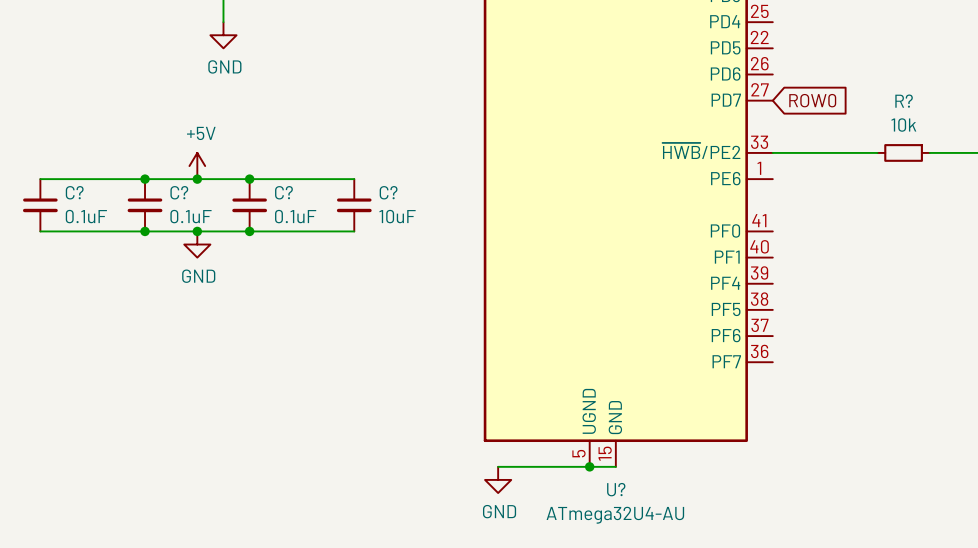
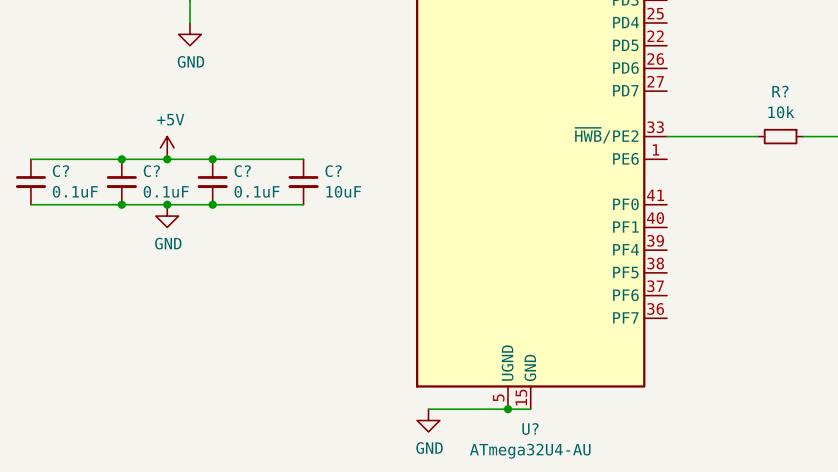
global label: ROW0 (812, 100) -> none

